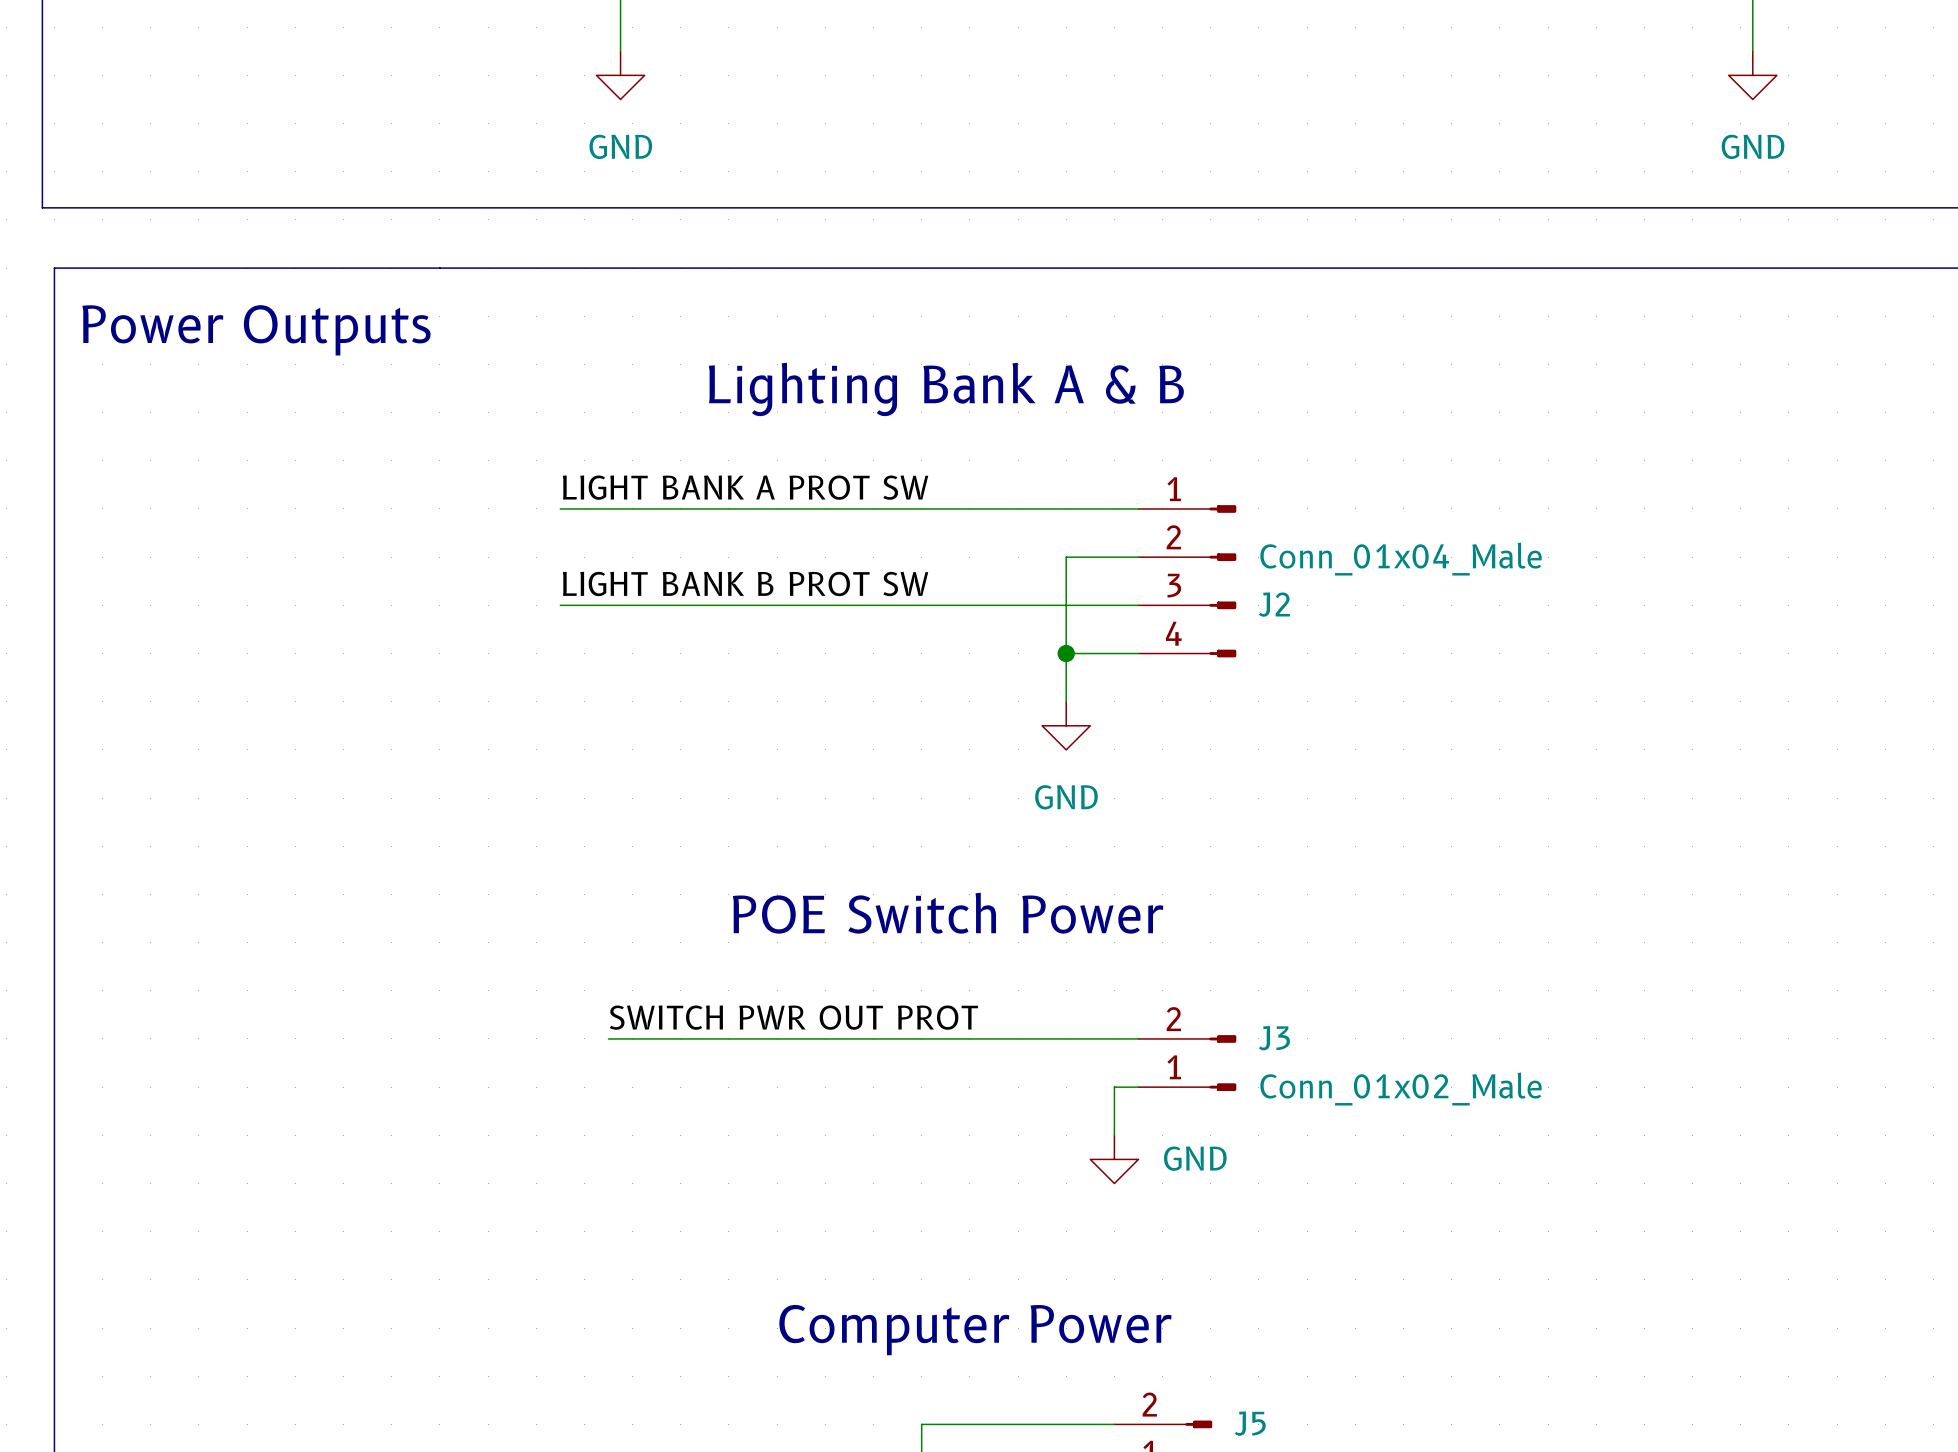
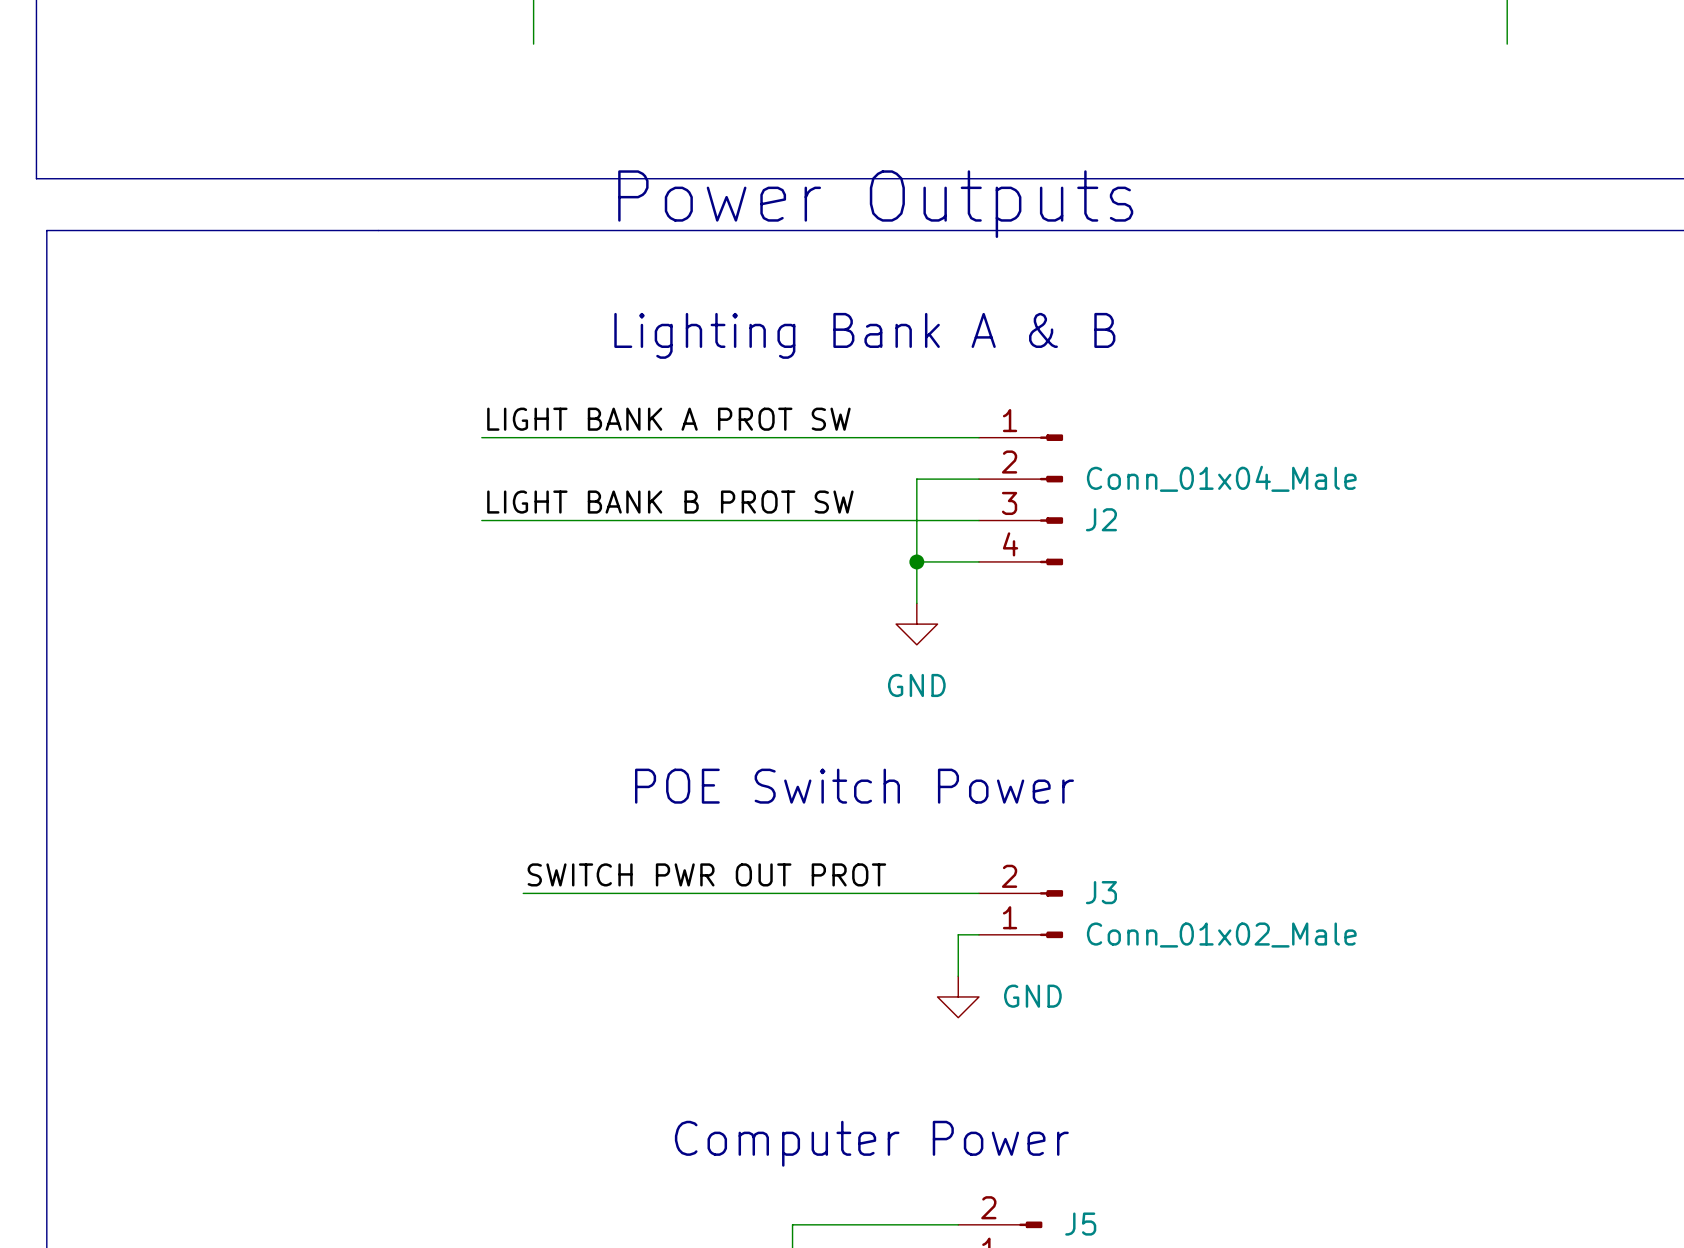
power symbol: GND (620, 75) -> none
power symbol: GND (1752, 75) -> none
text: none -> Power Outputs (875, 204)
text: Power Outputs (256, 330) -> none

